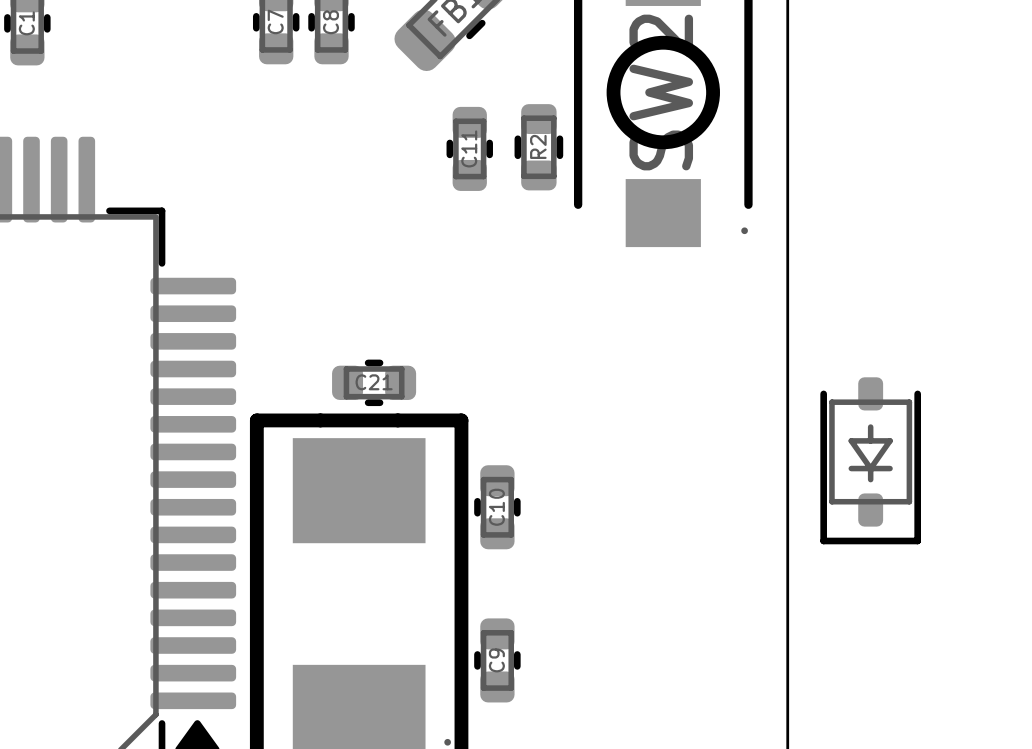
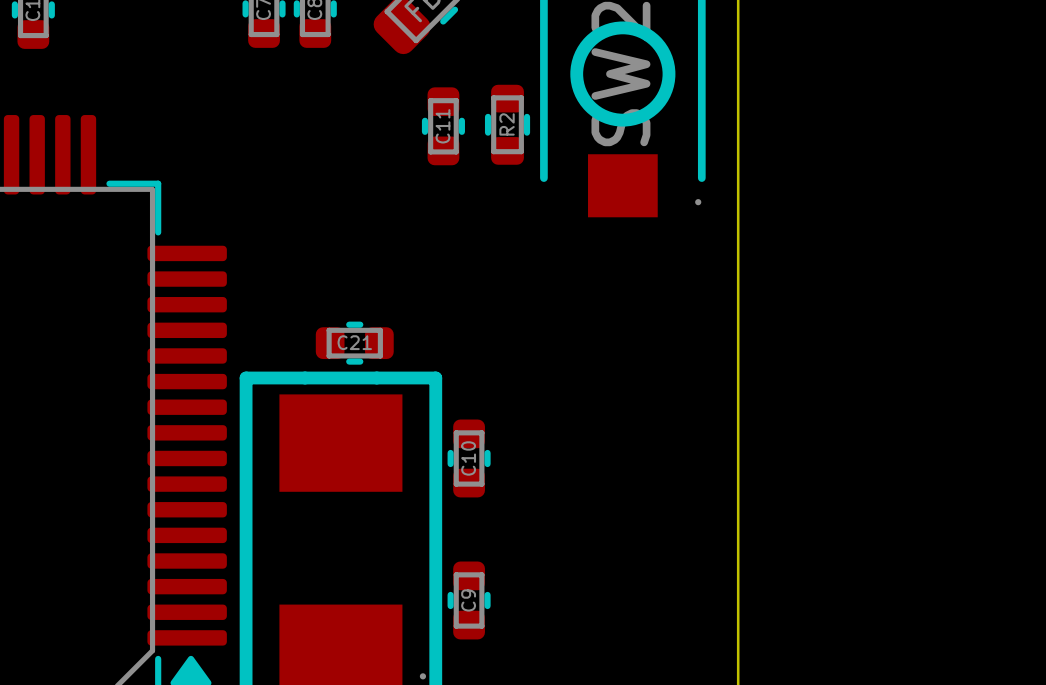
part: (870, 460) -> none

